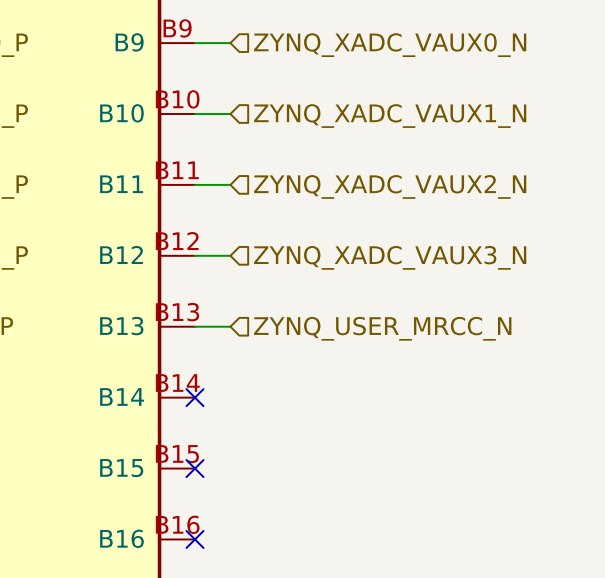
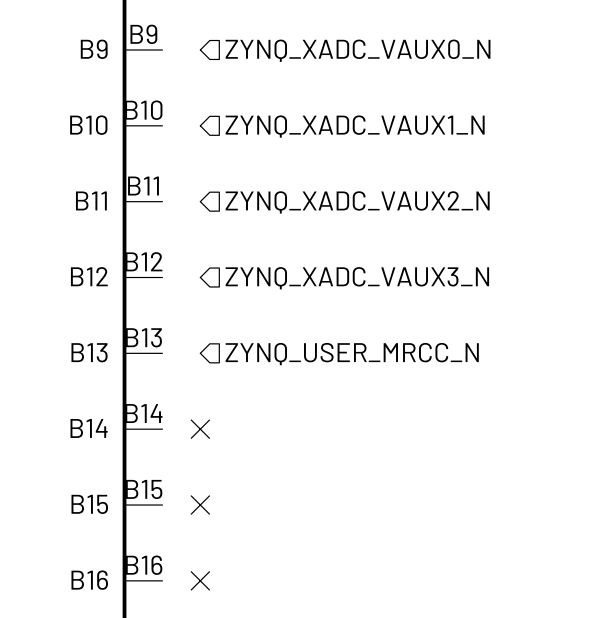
wire: (194, 43) (230, 43) -> none
wire: (194, 113) (230, 113) -> none
wire: (194, 184) (230, 184) -> none
wire: (194, 255) (230, 255) -> none
wire: (194, 326) (230, 326) -> none
no-connect mark position: (194, 397) -> (200, 429)
no-connect mark position: (194, 468) -> (200, 505)
no-connect mark position: (194, 539) -> (200, 580)

